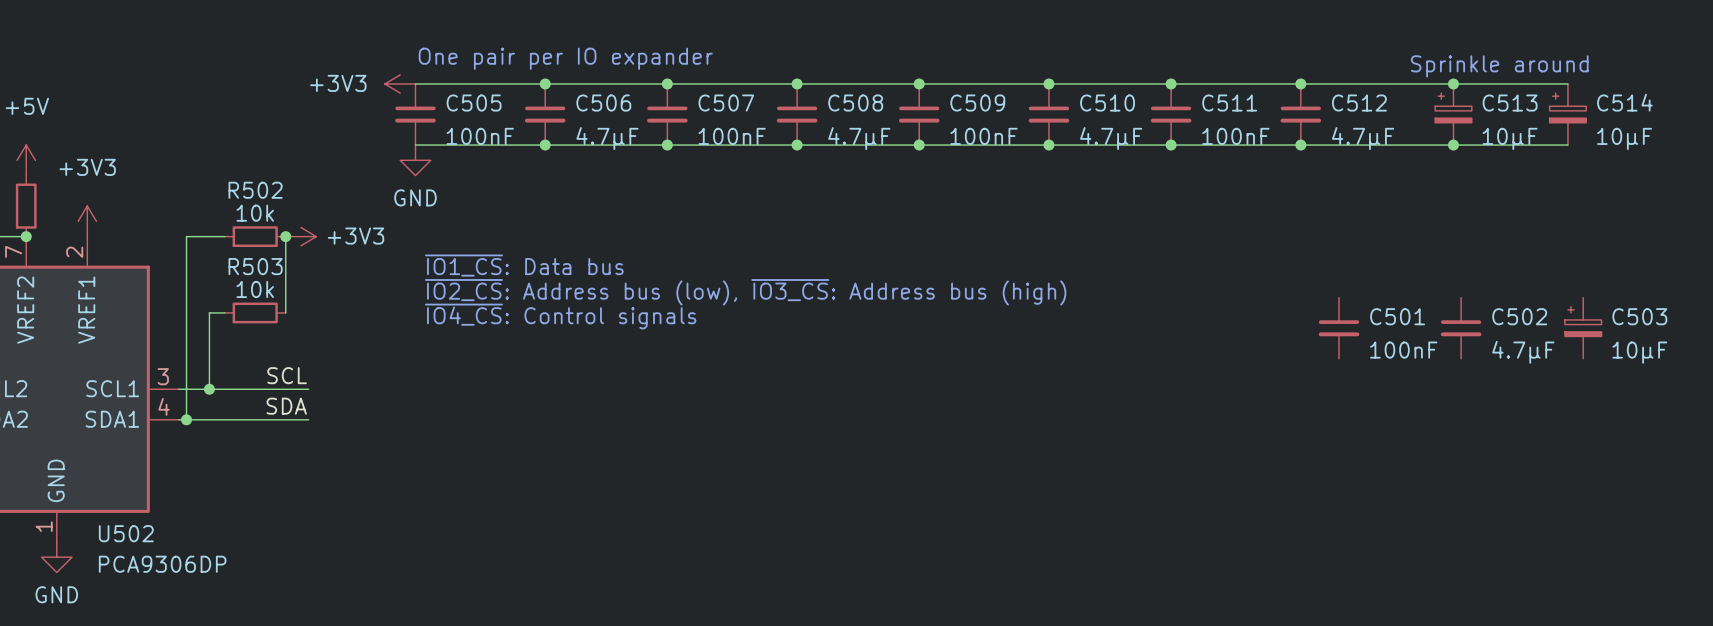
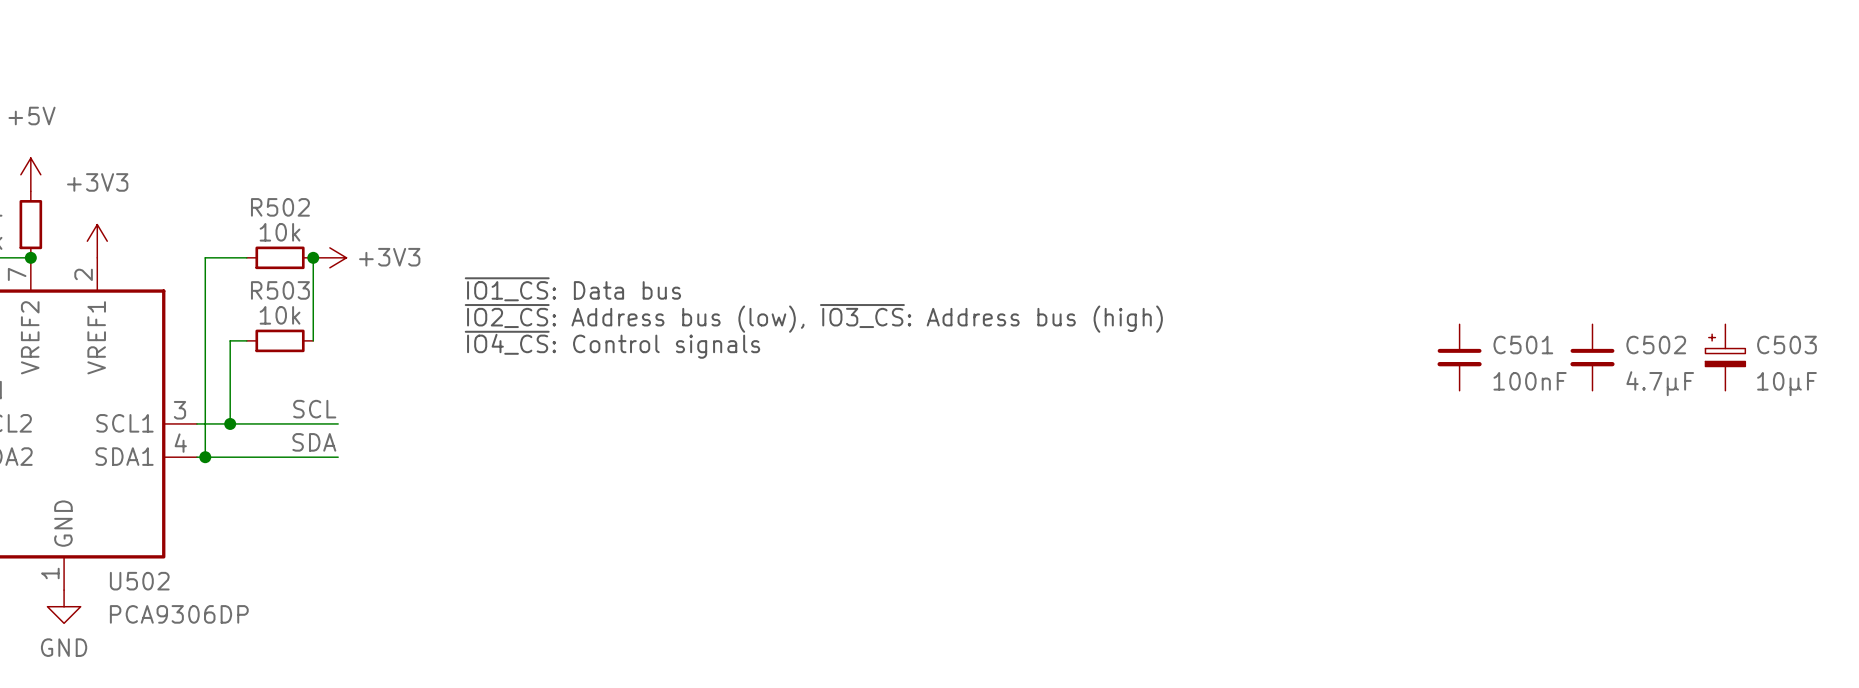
text: One pair per IO expander (565, 58) -> none
text: Sprinkle around (1499, 66) -> none
power symbol: +3V3 (400, 83) -> none
wire: (415, 83) (1567, 83) -> none
junction: (545, 83) -> none
junction: (667, 83) -> none
junction: (797, 83) -> none
junction: (919, 83) -> none
junction: (1048, 83) -> none
junction: (1171, 83) -> none
junction: (1300, 83) -> none
junction: (1453, 83) -> none
C505: 100nF (415, 114) -> none
C506: 4.7µF (545, 114) -> none
C507: 100nF (667, 114) -> none
C508: 4.7µF (797, 114) -> none
C509: 100nF (919, 114) -> none
C510: 4.7µF (1048, 114) -> none
C511: 100nF (1171, 114) -> none
C512: 4.7µF (1300, 114) -> none
C513: 10µF (1453, 114) -> none
C514: 10µF (1567, 114) -> none
wire: (415, 145) (1567, 145) -> none
junction: (545, 145) -> none
junction: (667, 145) -> none
junction: (797, 145) -> none
junction: (919, 145) -> none
junction: (1048, 145) -> none
junction: (1171, 145) -> none
junction: (1300, 145) -> none
junction: (1453, 145) -> none
power symbol: GND (415, 160) -> none

